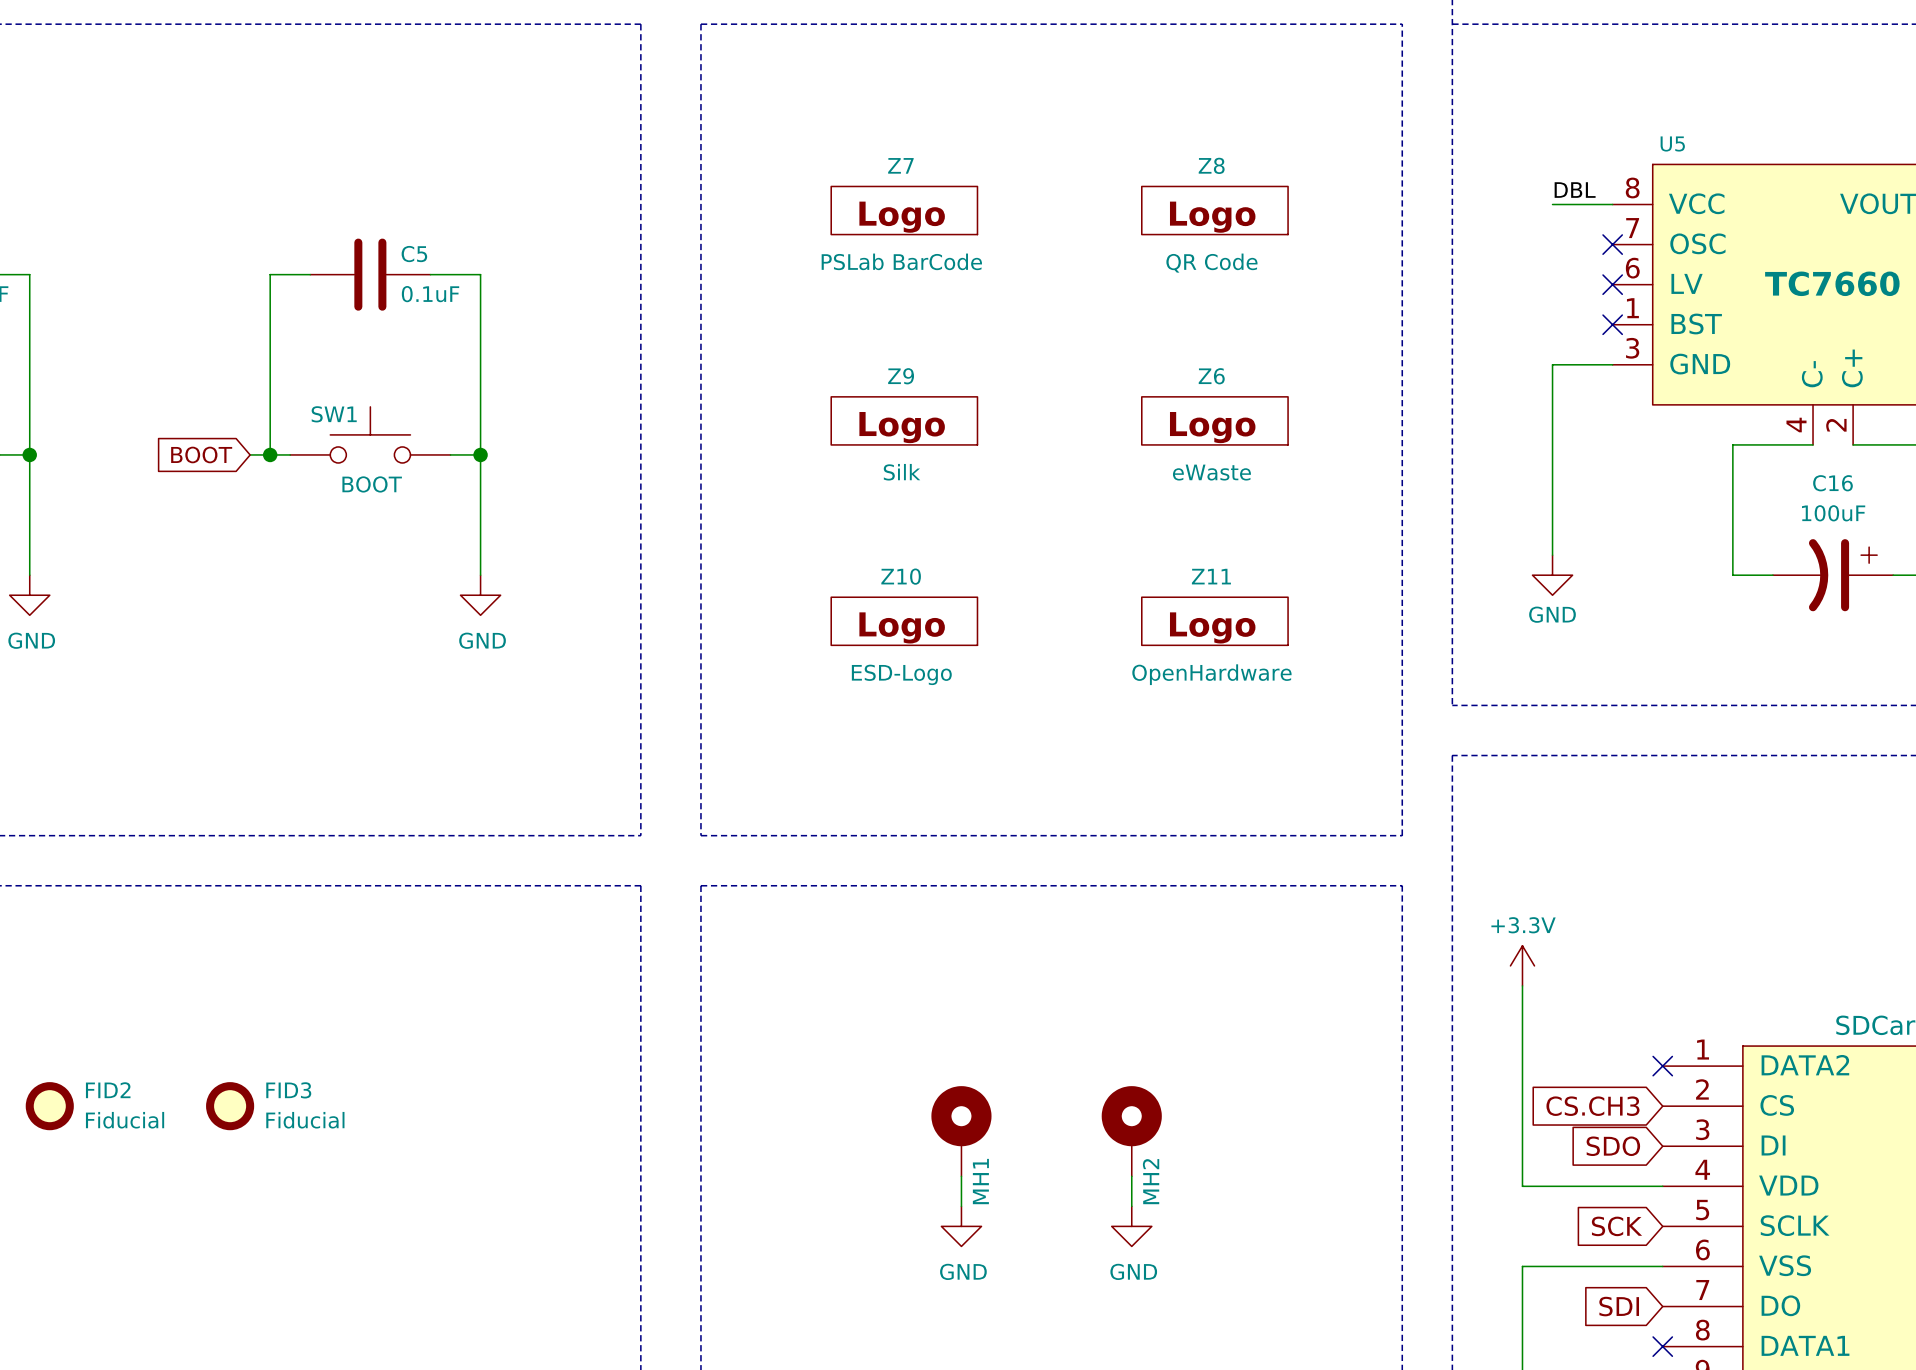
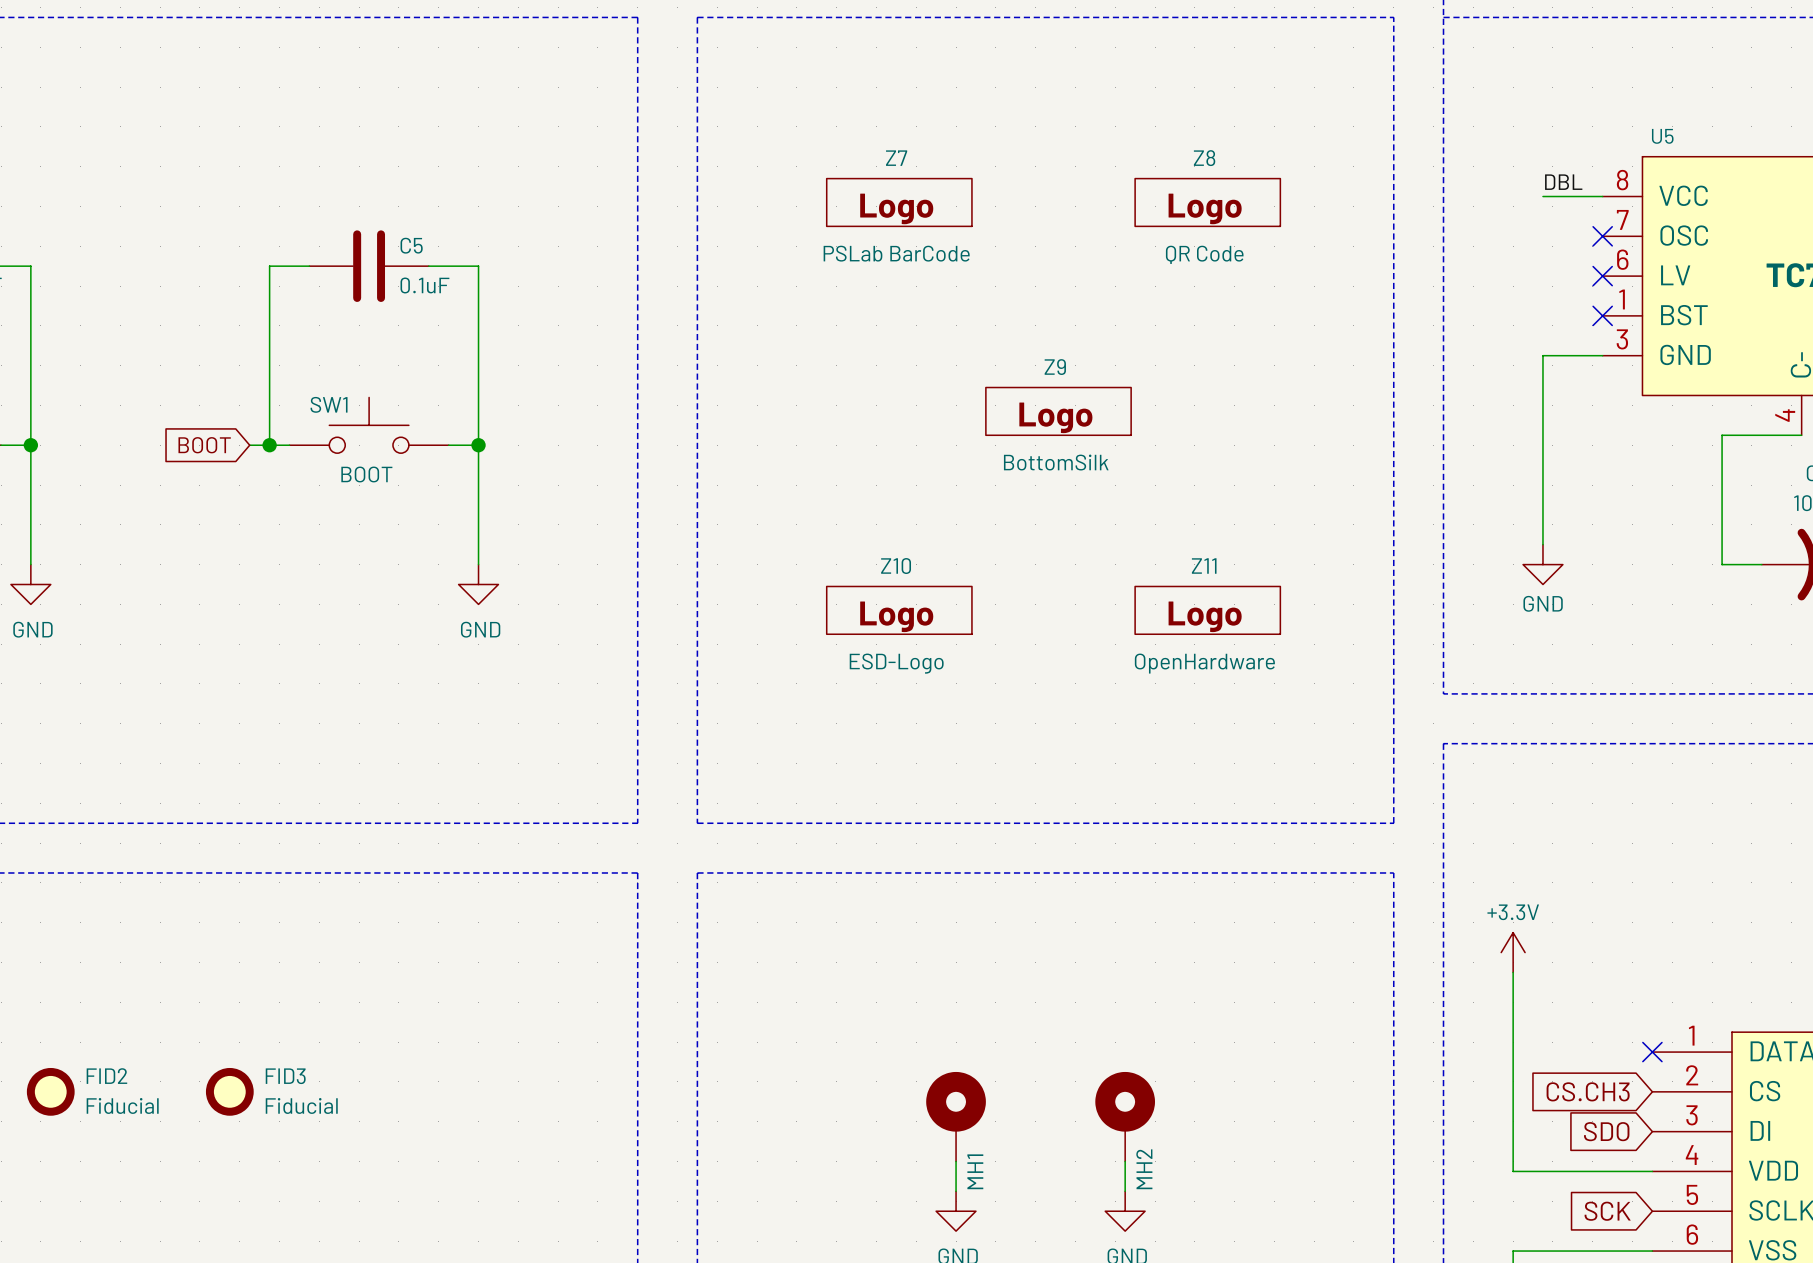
Z9 position: (904, 420) -> (1058, 411)
Z6: eWaste (1214, 420) -> none
Z9 value: Silk (902, 472) -> BottomSilk (1056, 462)

